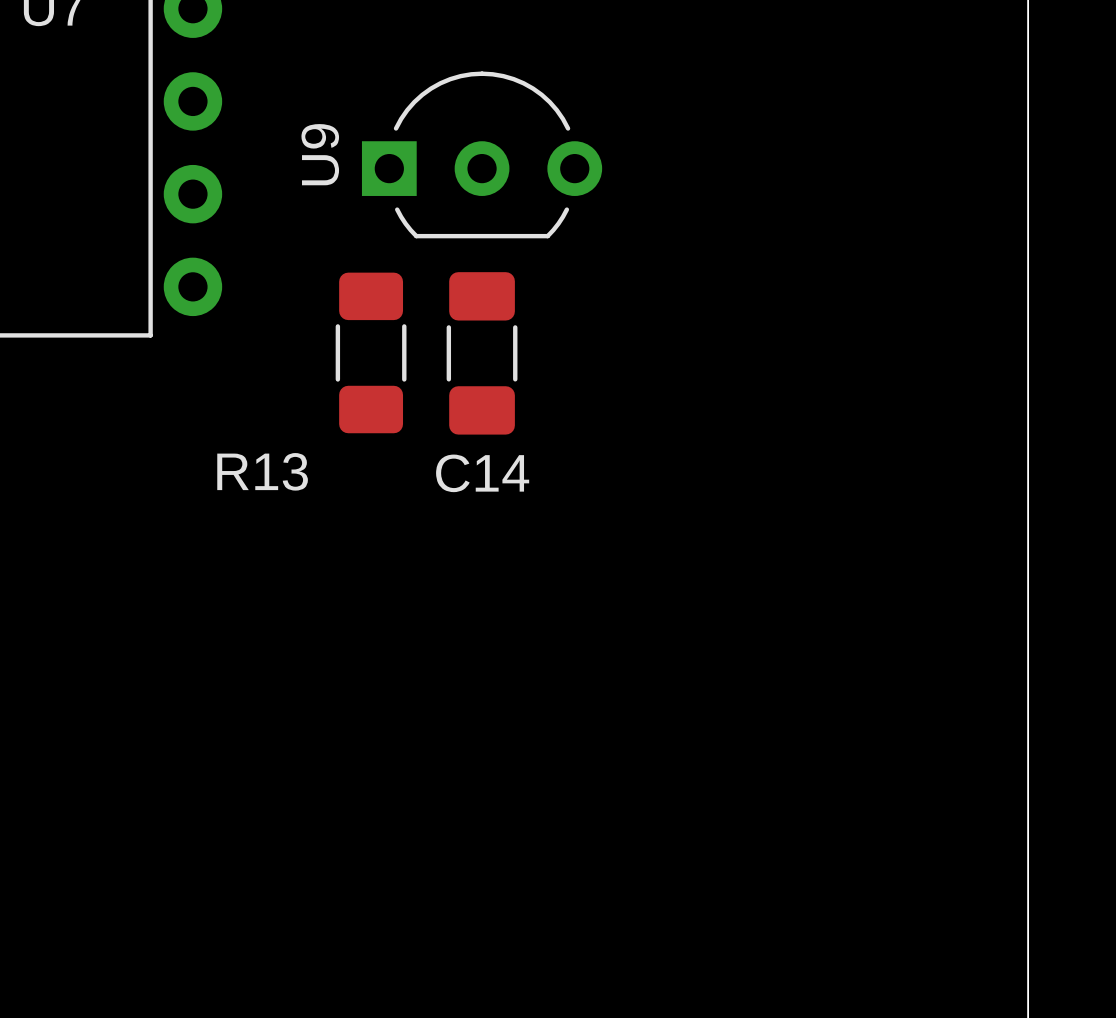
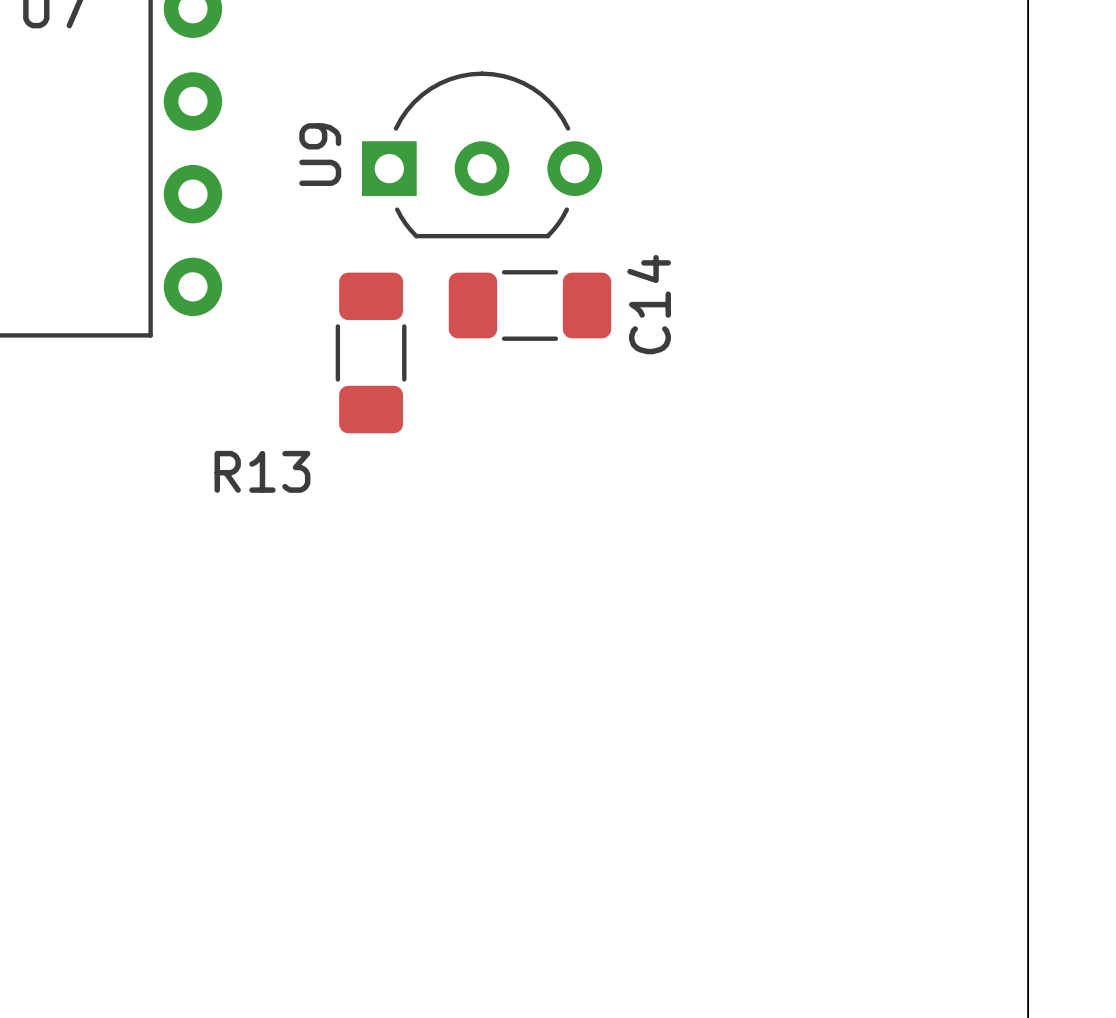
C14 rotation: 0° (482, 353) -> 90° clockwise (529, 305)
C14 name position: C14 (482, 473) -> C14 (649, 304)

